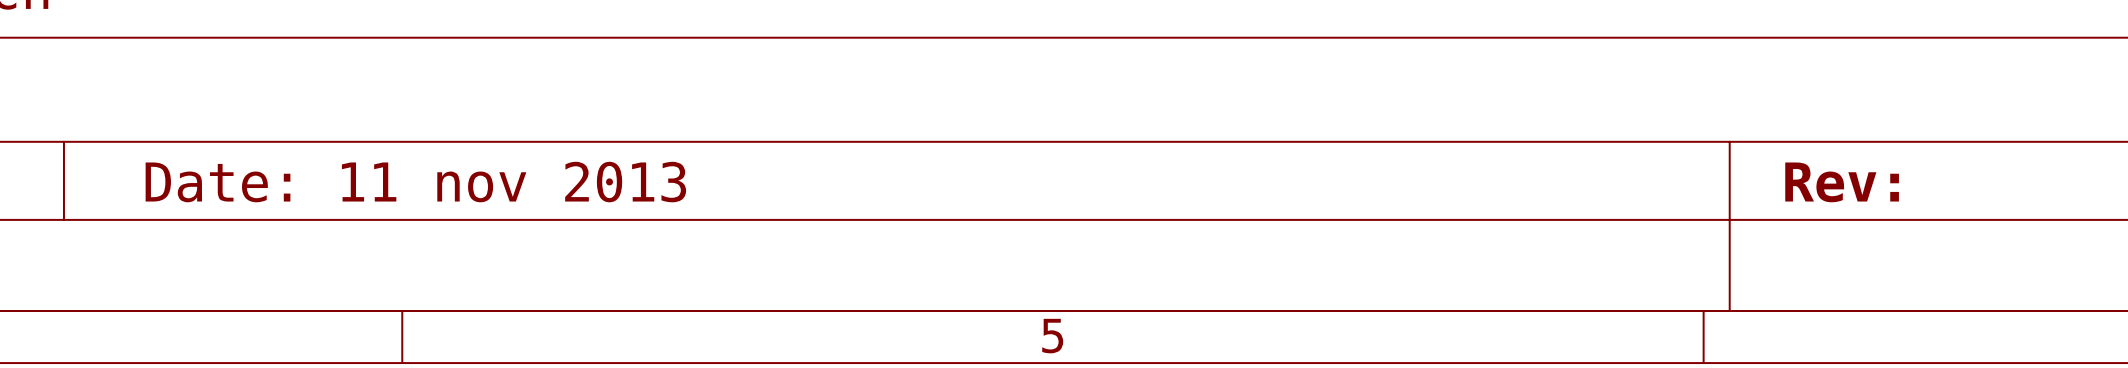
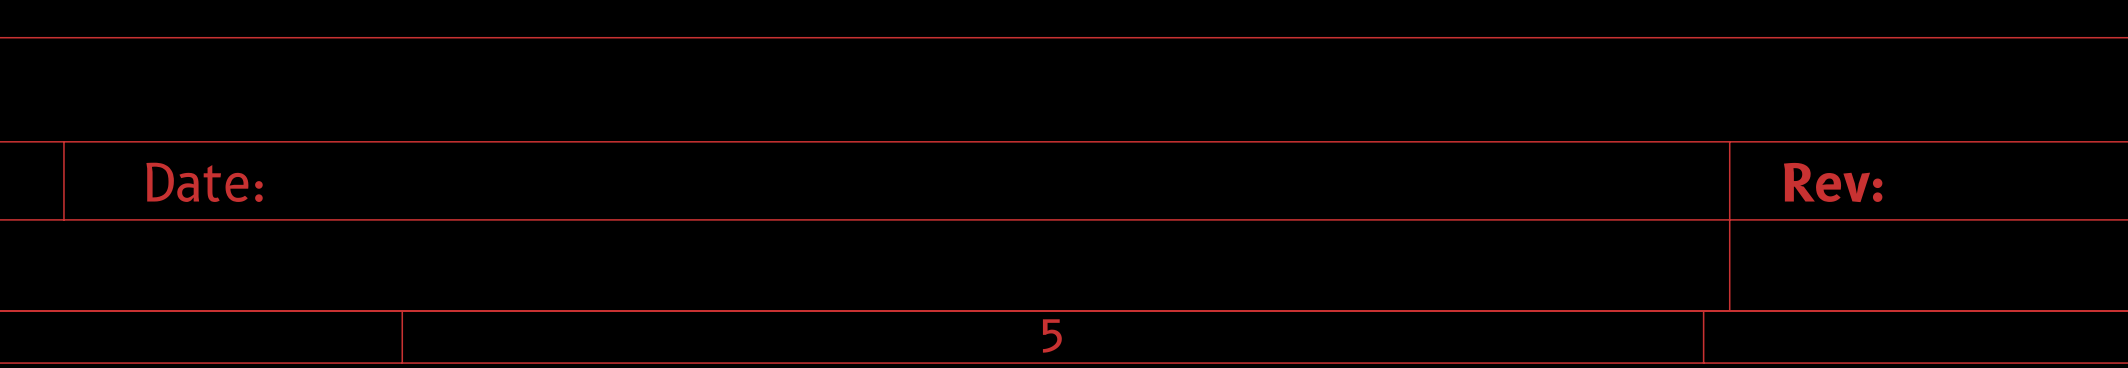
title block: Date: 11 nov 2013 (415, 182) -> Date: (204, 182)

